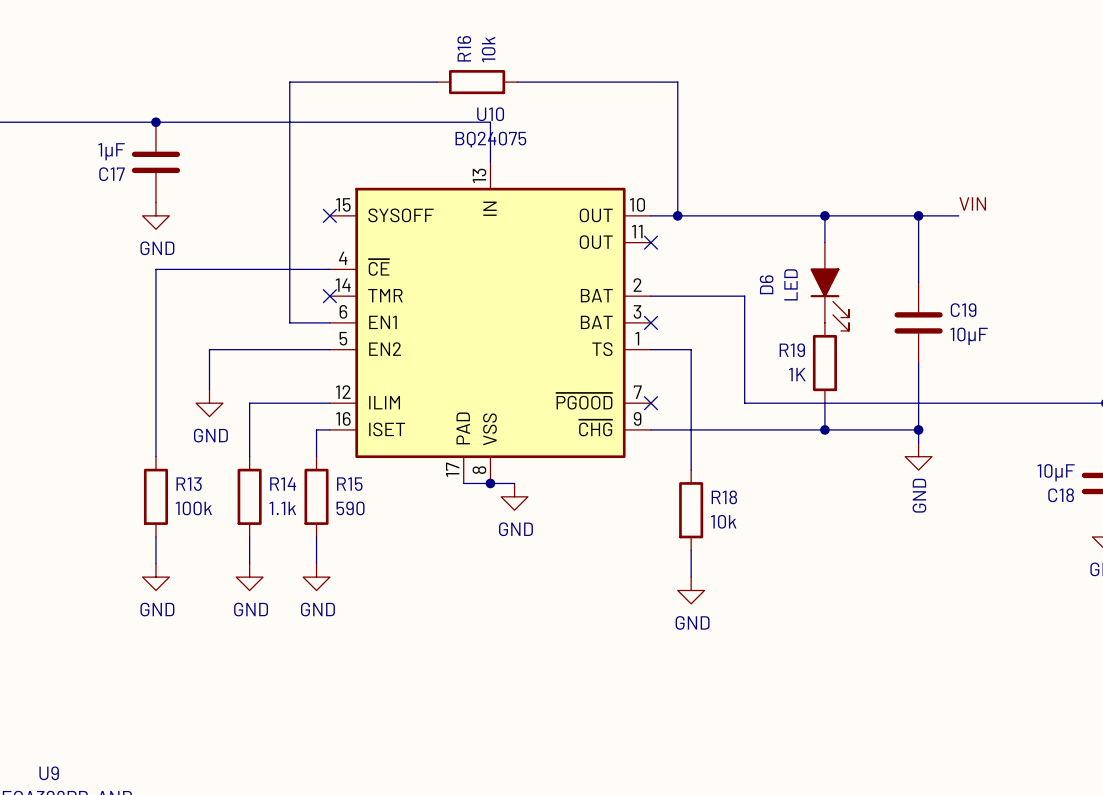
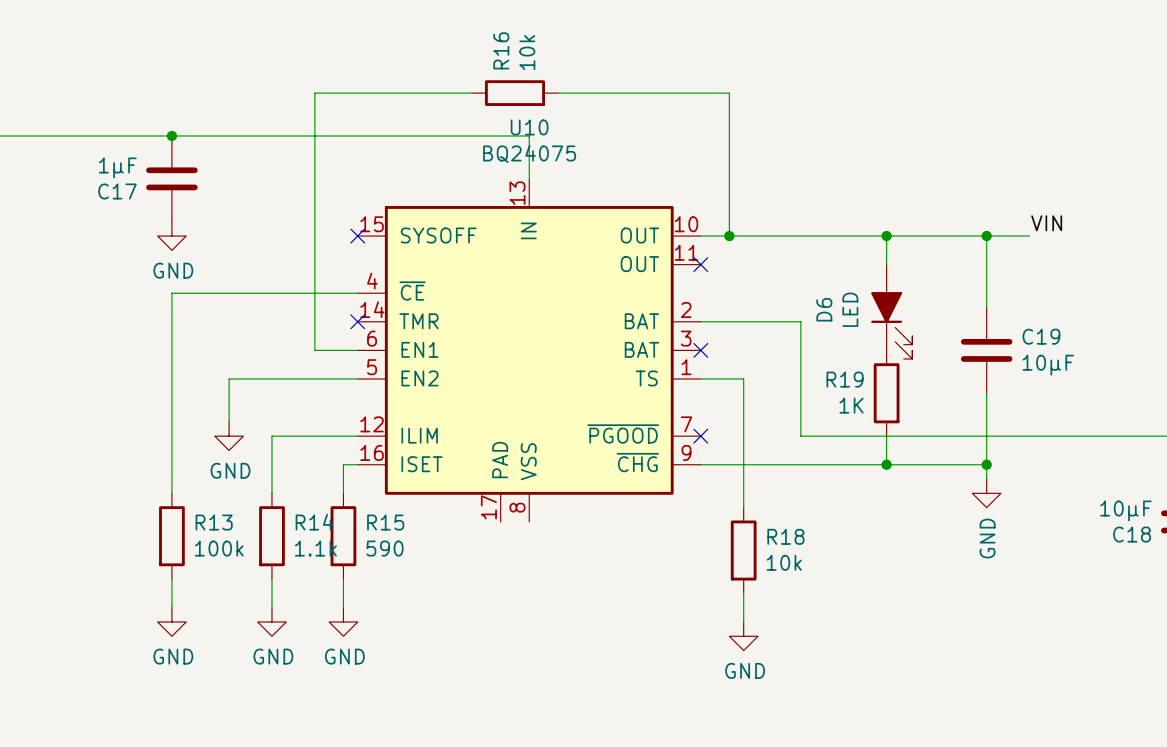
wire: (463, 483) (514, 483) -> none
junction: (490, 483) -> none
power symbol: GND (514, 496) -> none

